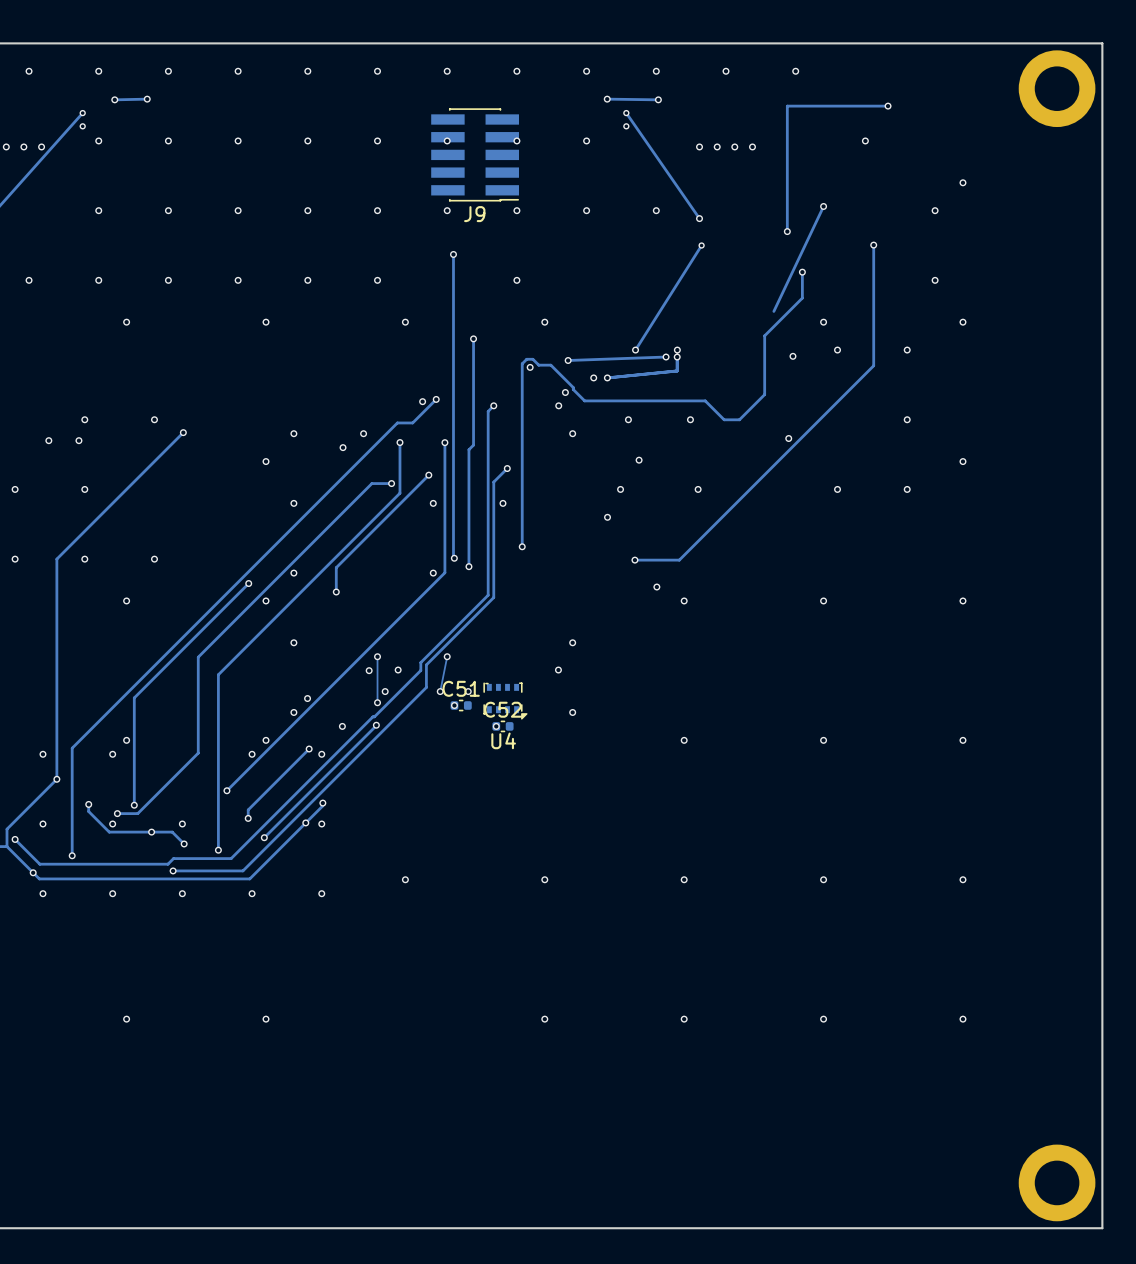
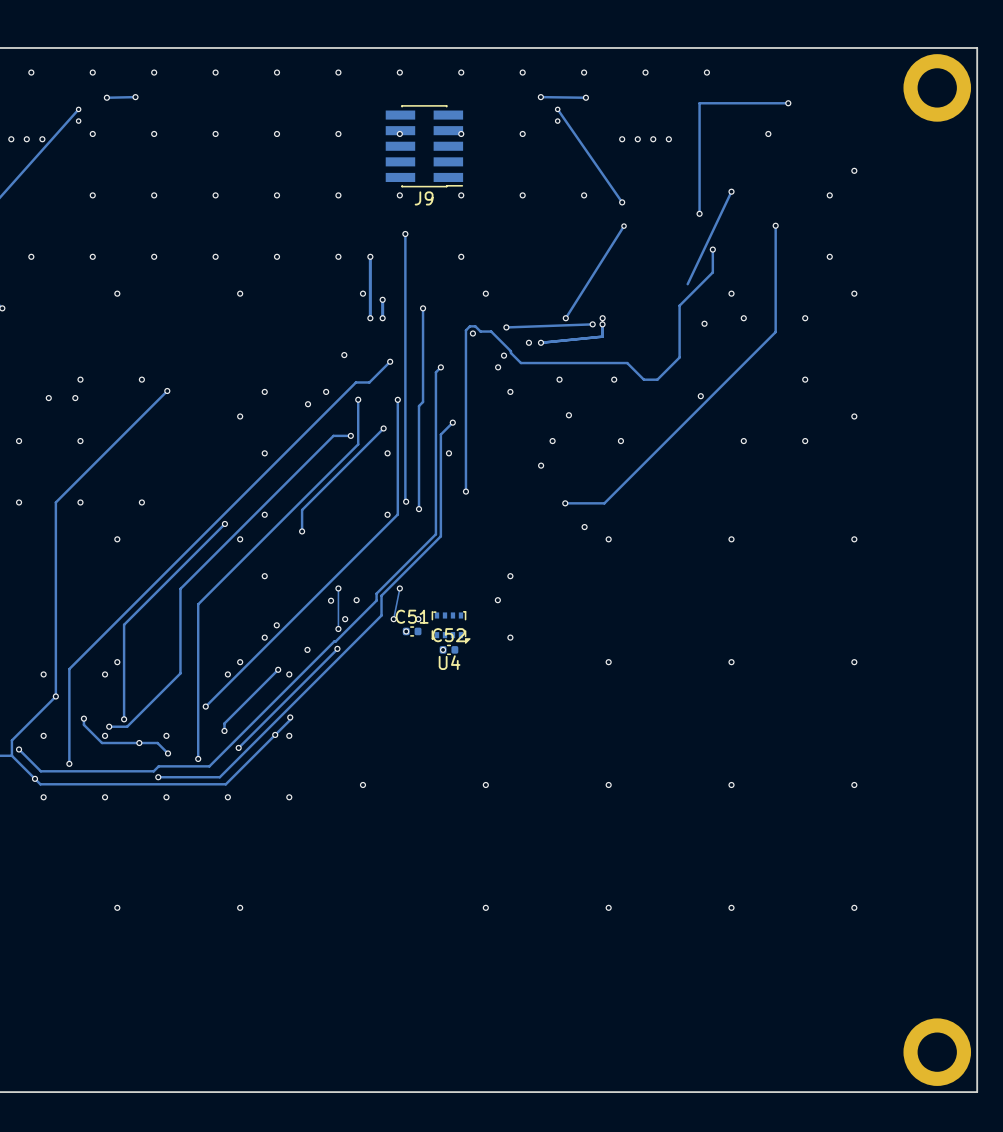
track: none -> (370, 256) (370, 318)
via: none -> (370, 256)
track: none -> (382, 299) (382, 318)
via: none -> (382, 299)
via: none -> (370, 318)
via: none -> (382, 318)
via: none -> (344, 355)
via: (422, 401) -> none

